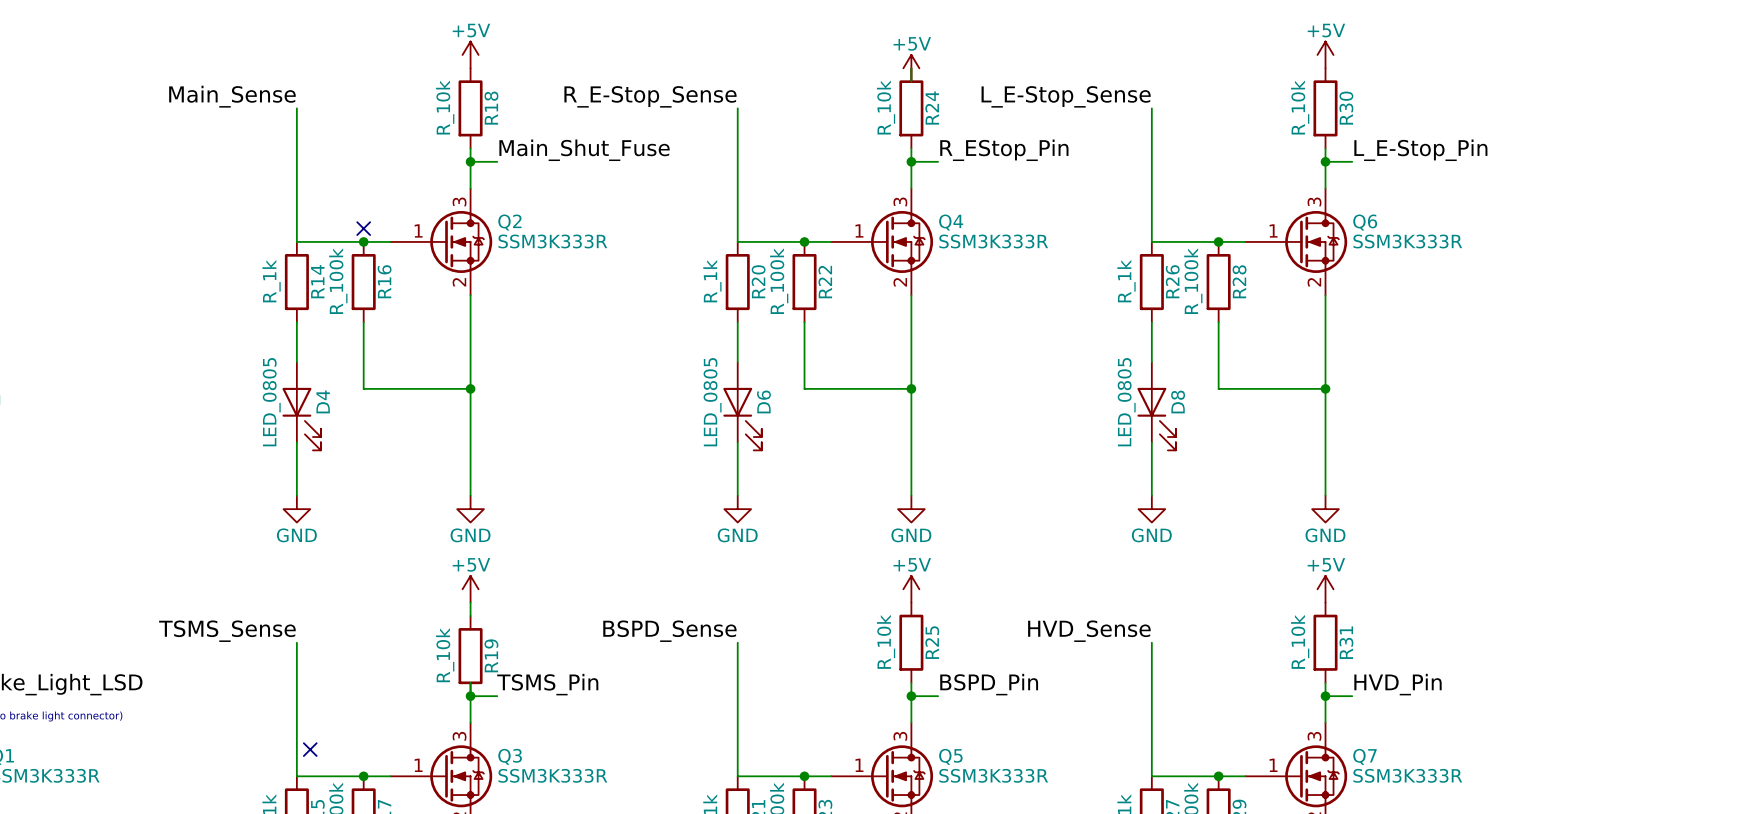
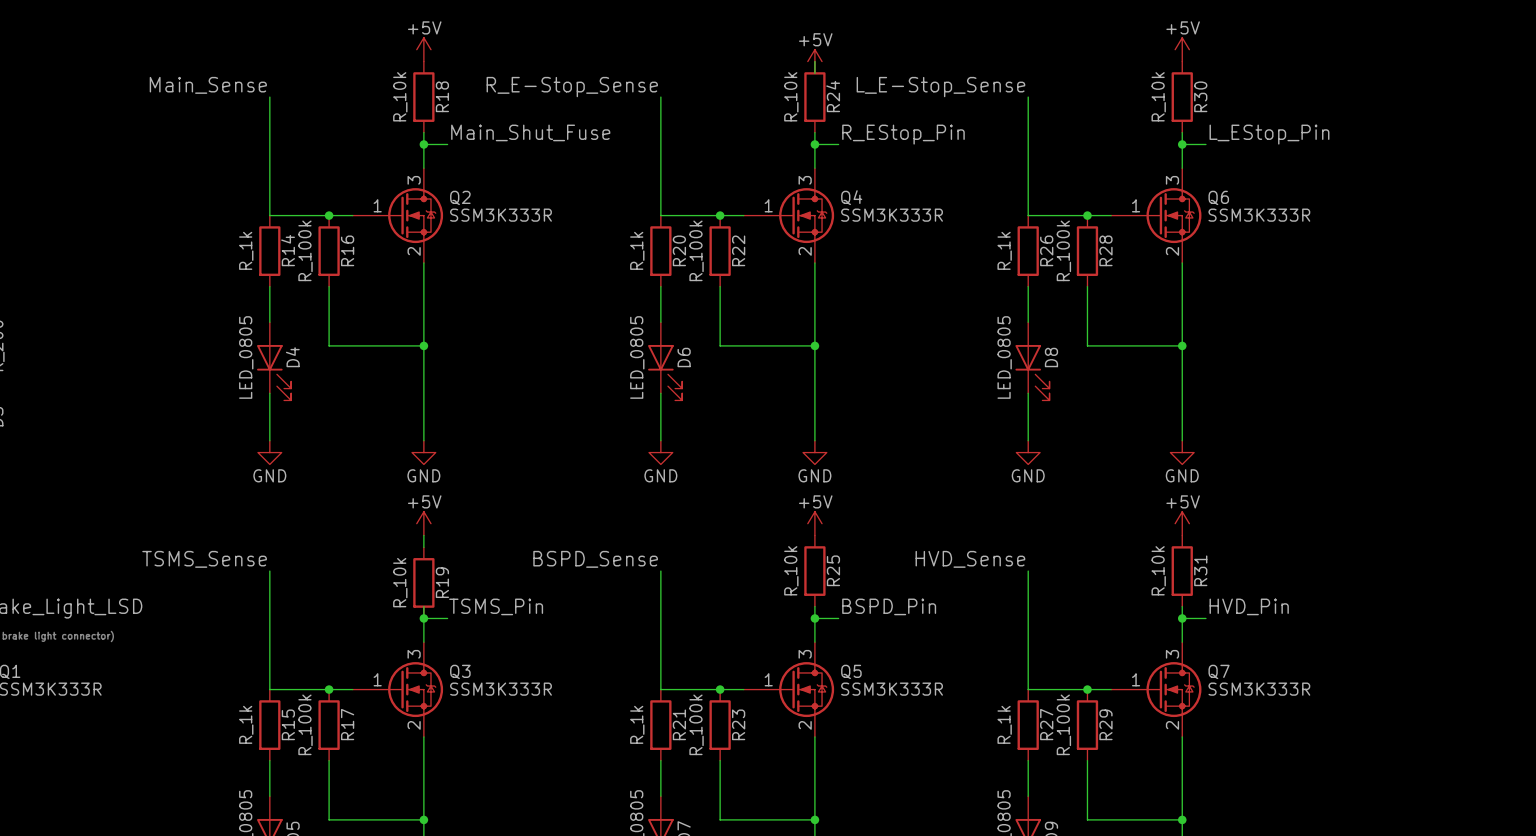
label: L_E-Stop_Pin (1420, 150) -> L_EStop_Pin (1269, 134)
no-connect mark: (363, 228) -> none
no-connect mark: (310, 749) -> none

